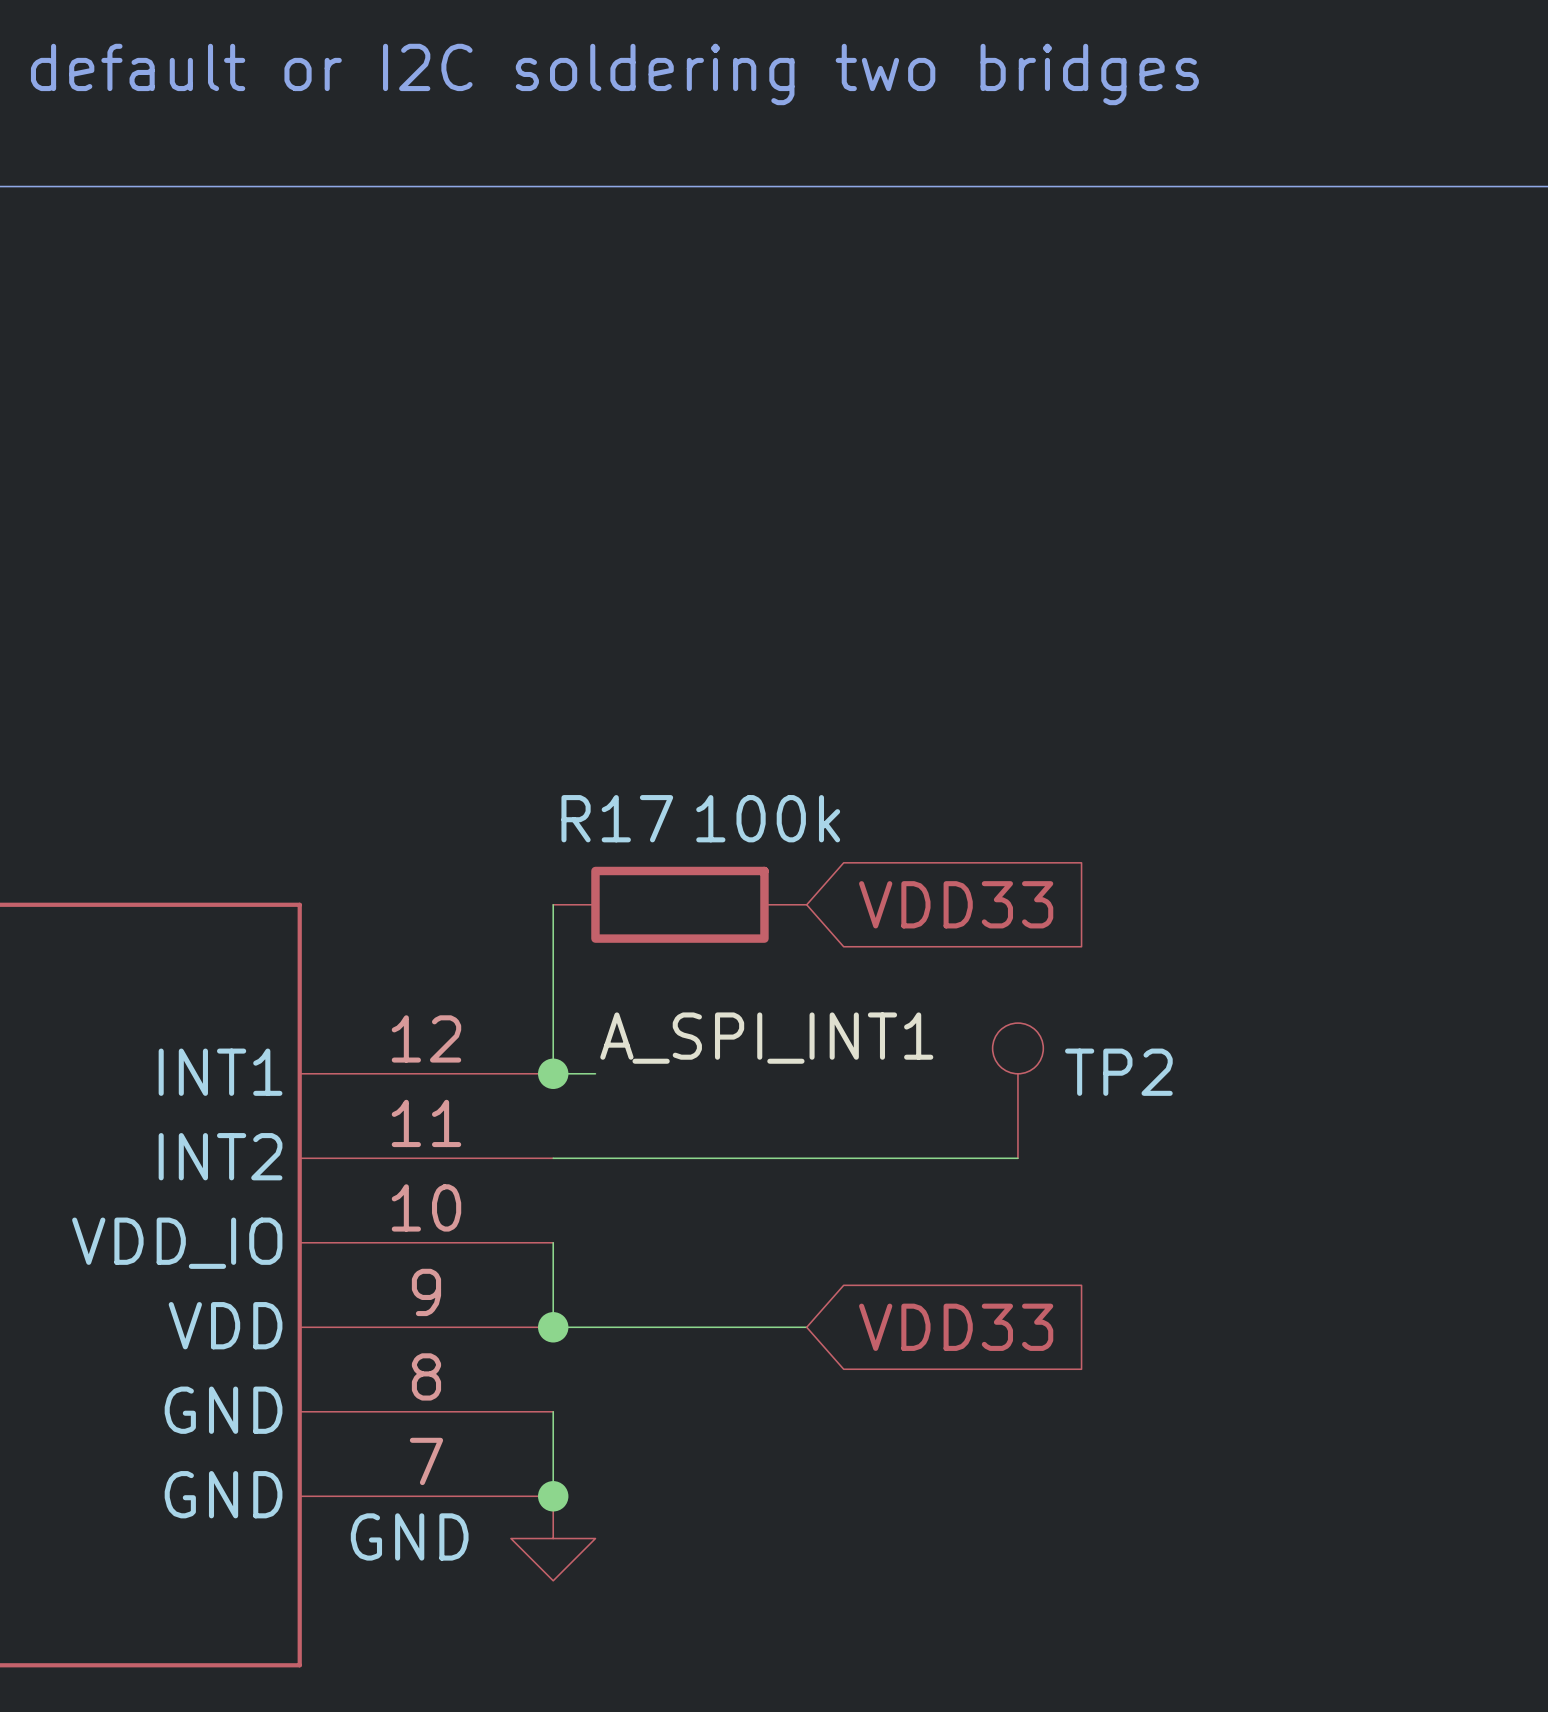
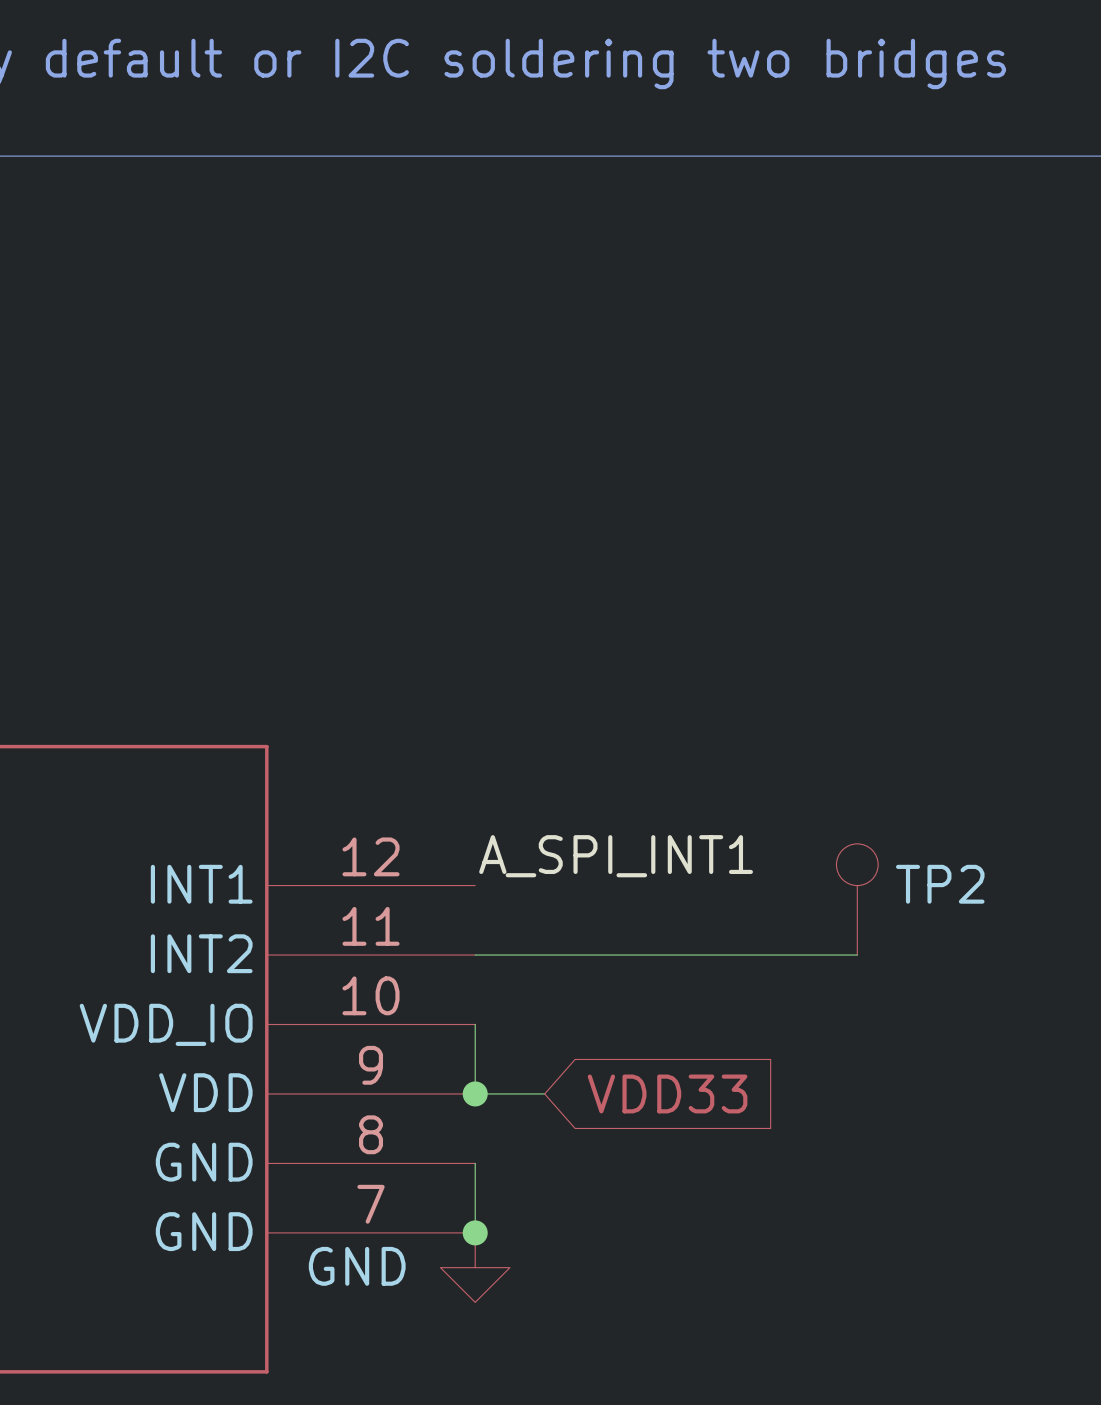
wire: (553, 904) (553, 1073) (595, 1073) -> none
R17: 100k (679, 904) -> none
global label: VDD33 (956, 904) -> none
label position: A_SPI_INT1 (766, 1038) -> A_SPI_INT1 (616, 856)
junction: (553, 1073) -> none
wire: (637, 1327) (806, 1327) -> none
global label position: VDD33 (956, 1327) -> VDD33 (667, 1093)

